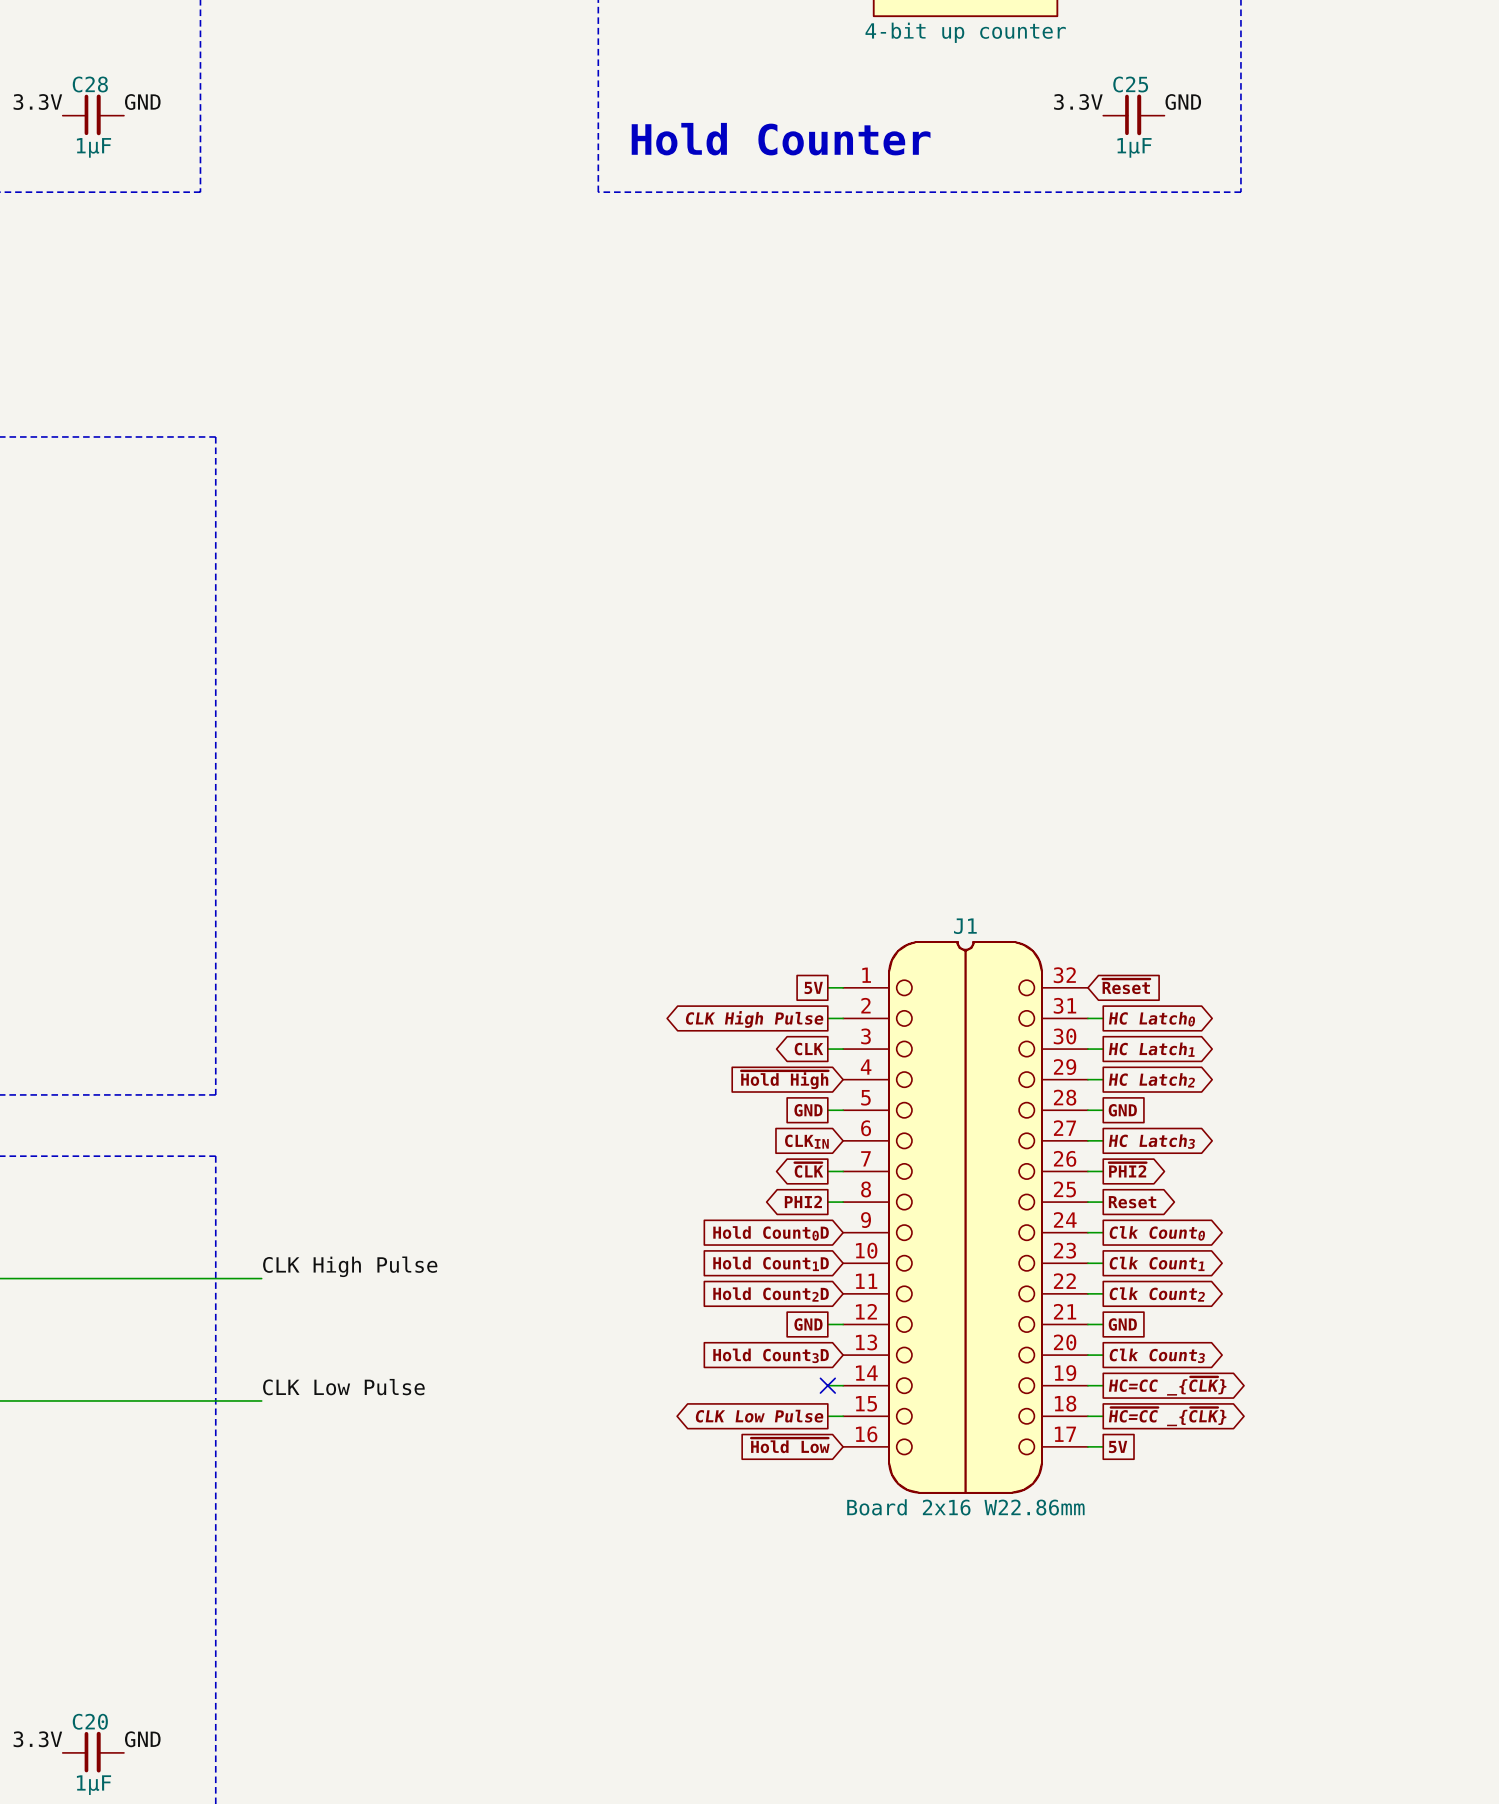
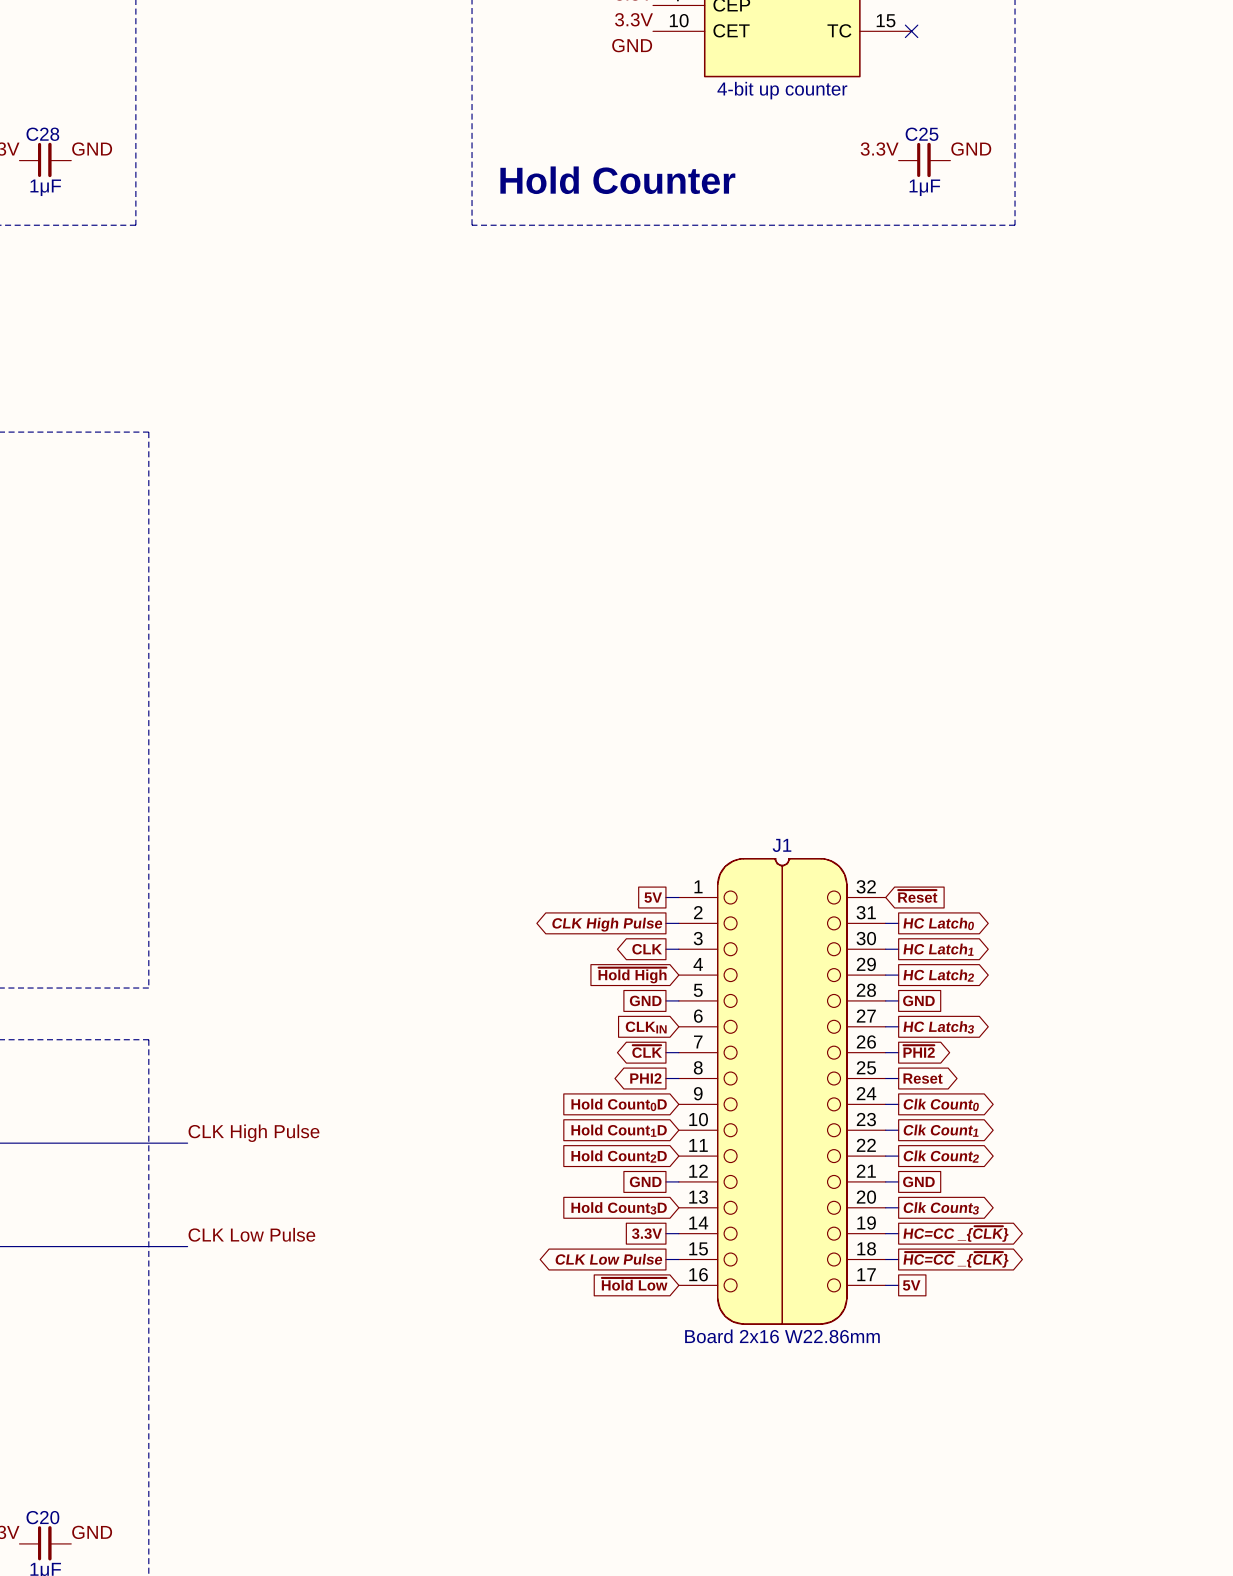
global label: none -> 3.3V (647, 1233)
no-connect mark: (827, 1385) -> none

